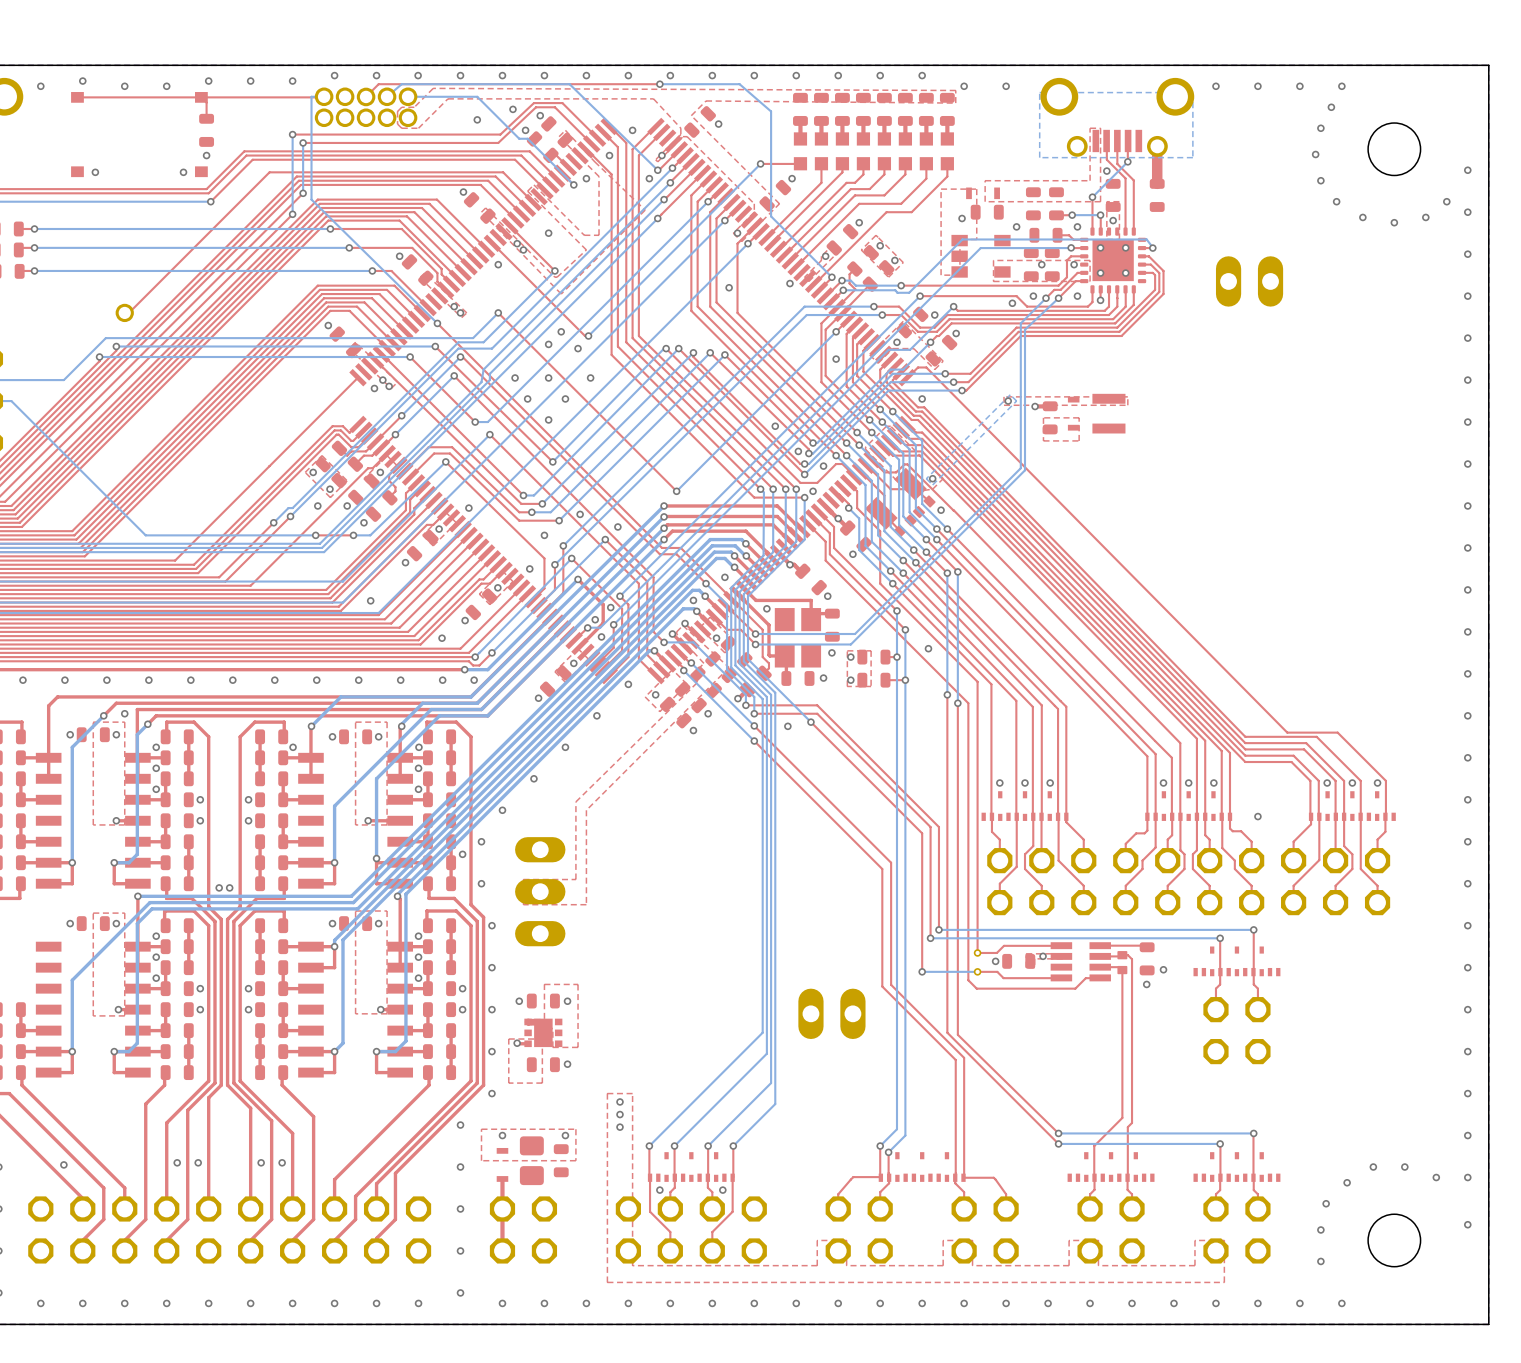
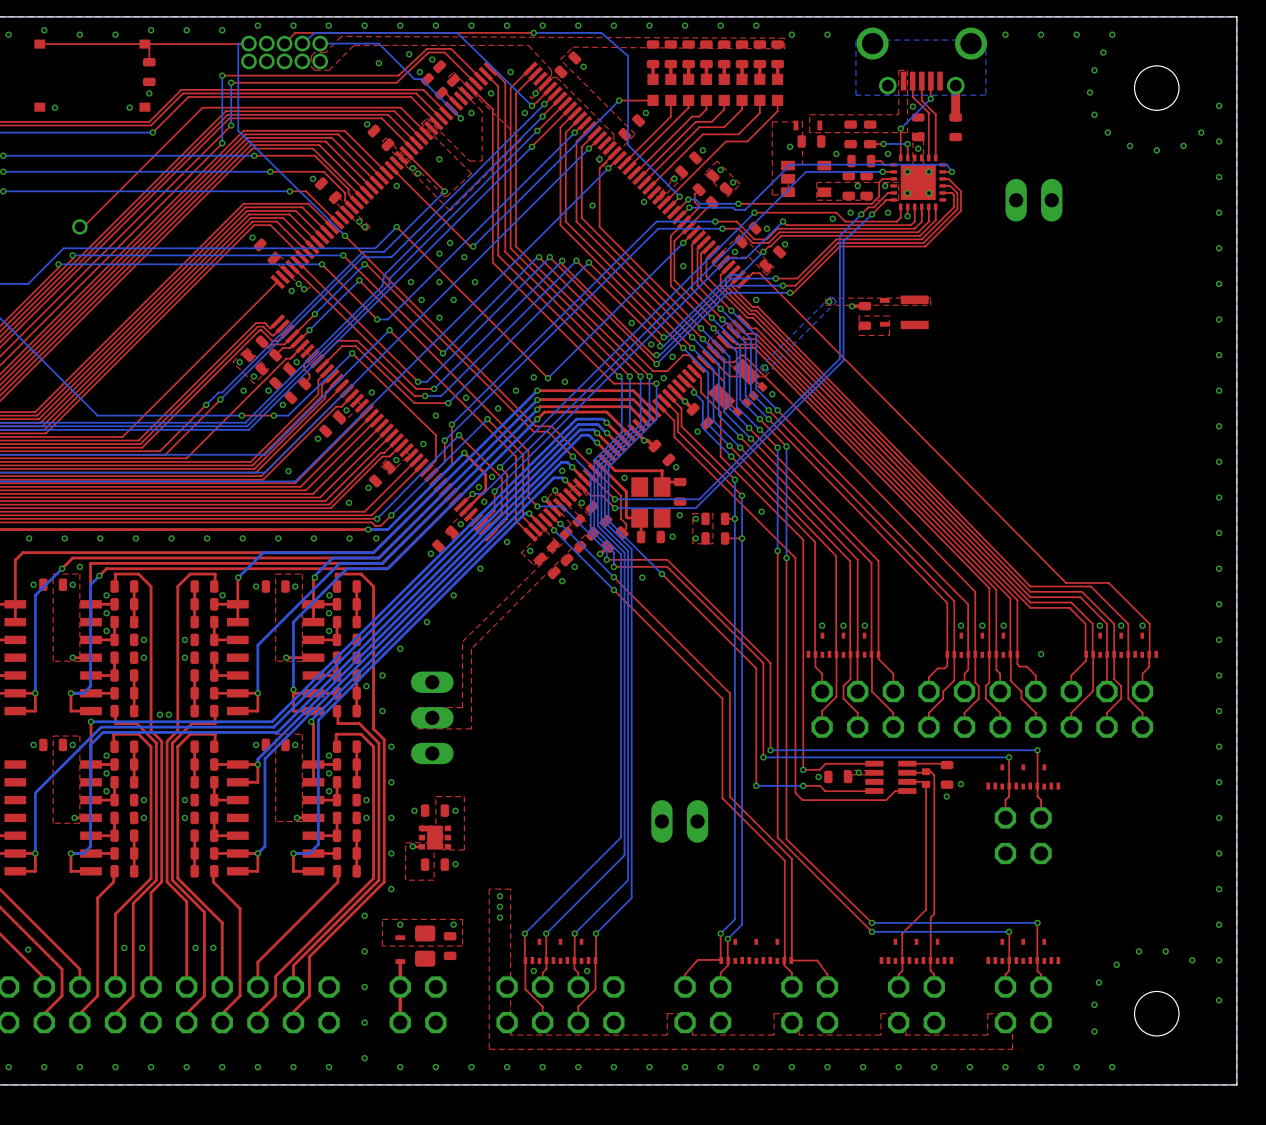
via: none -> (533, 377)
via: none -> (564, 381)
via: none -> (515, 390)

